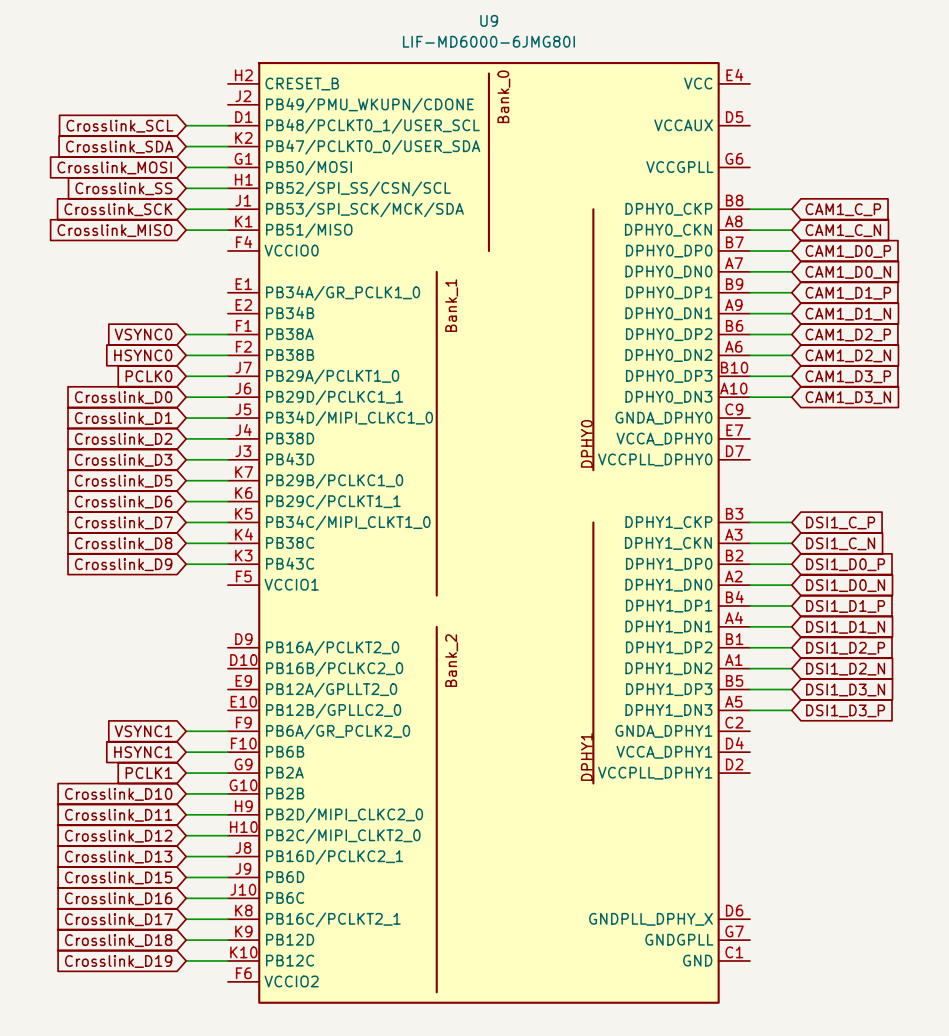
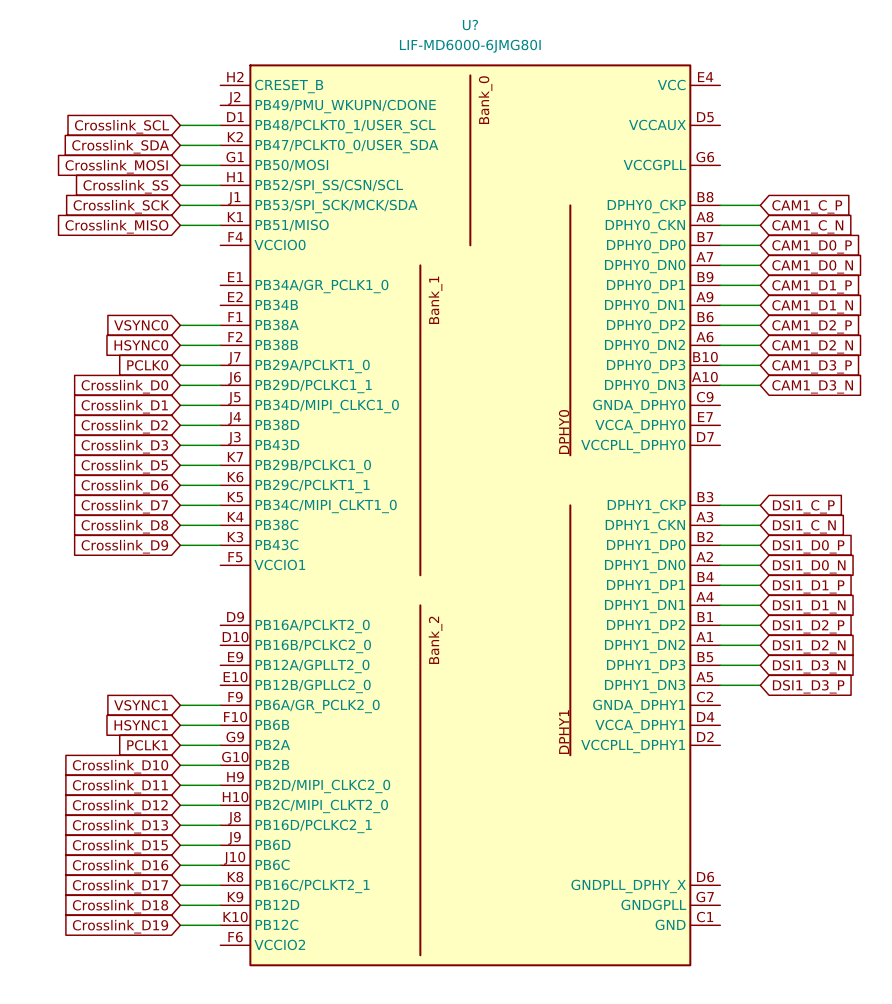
U9 name: U9 (489, 20) -> U? (470, 25)

